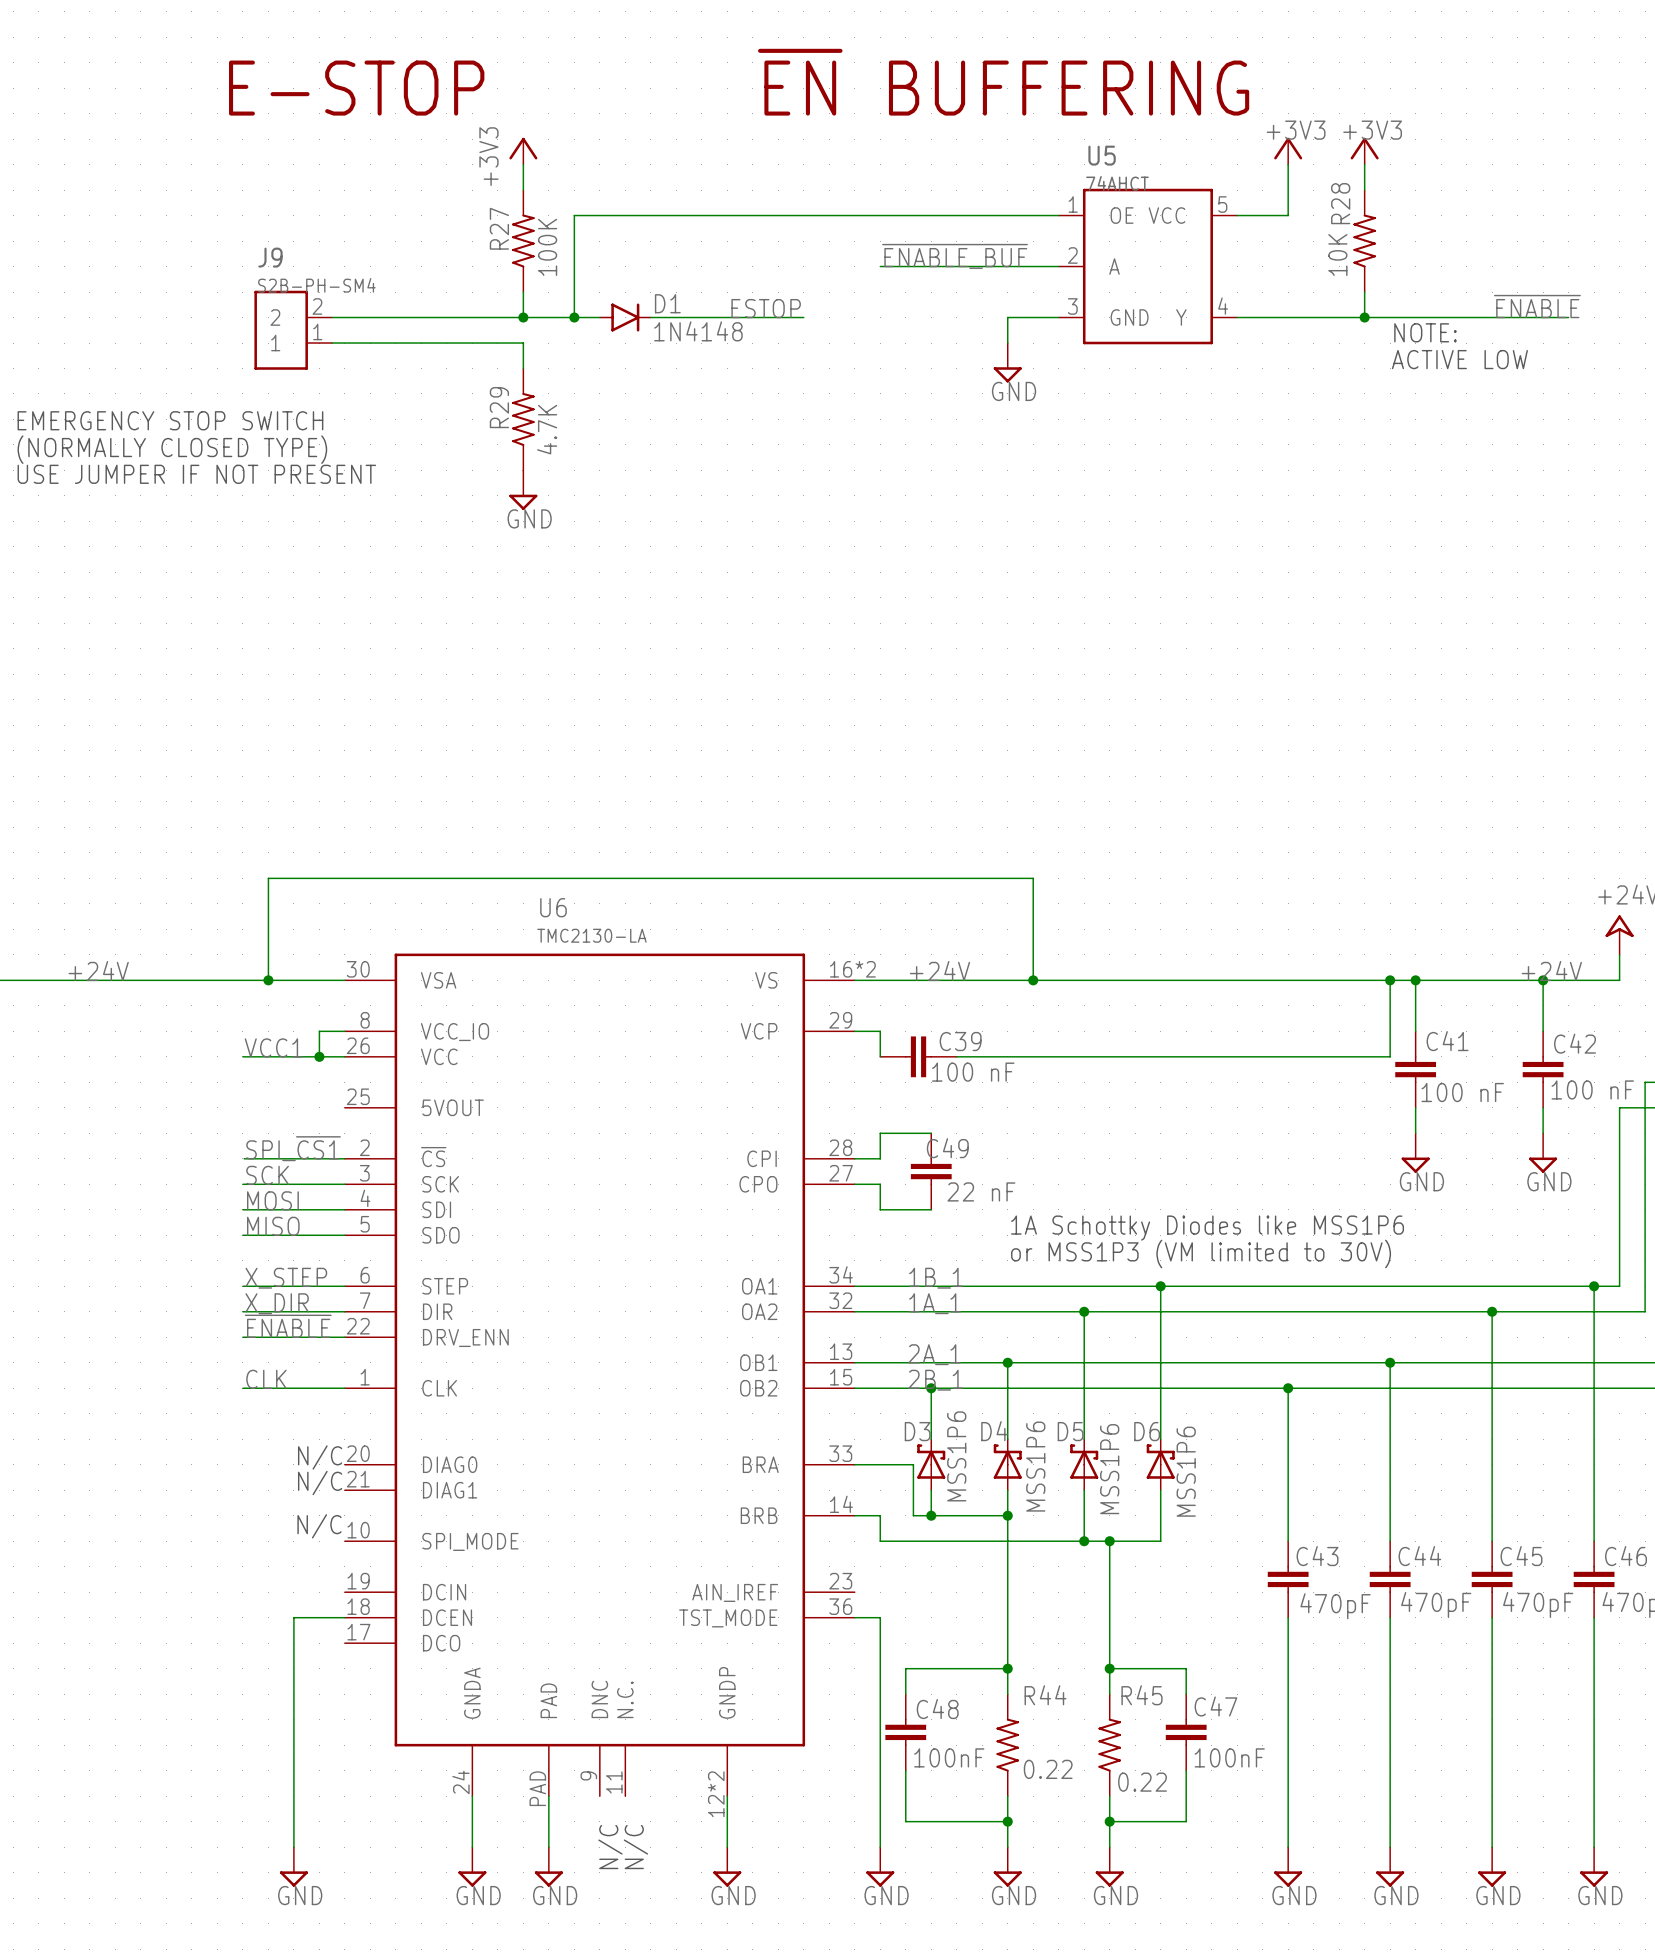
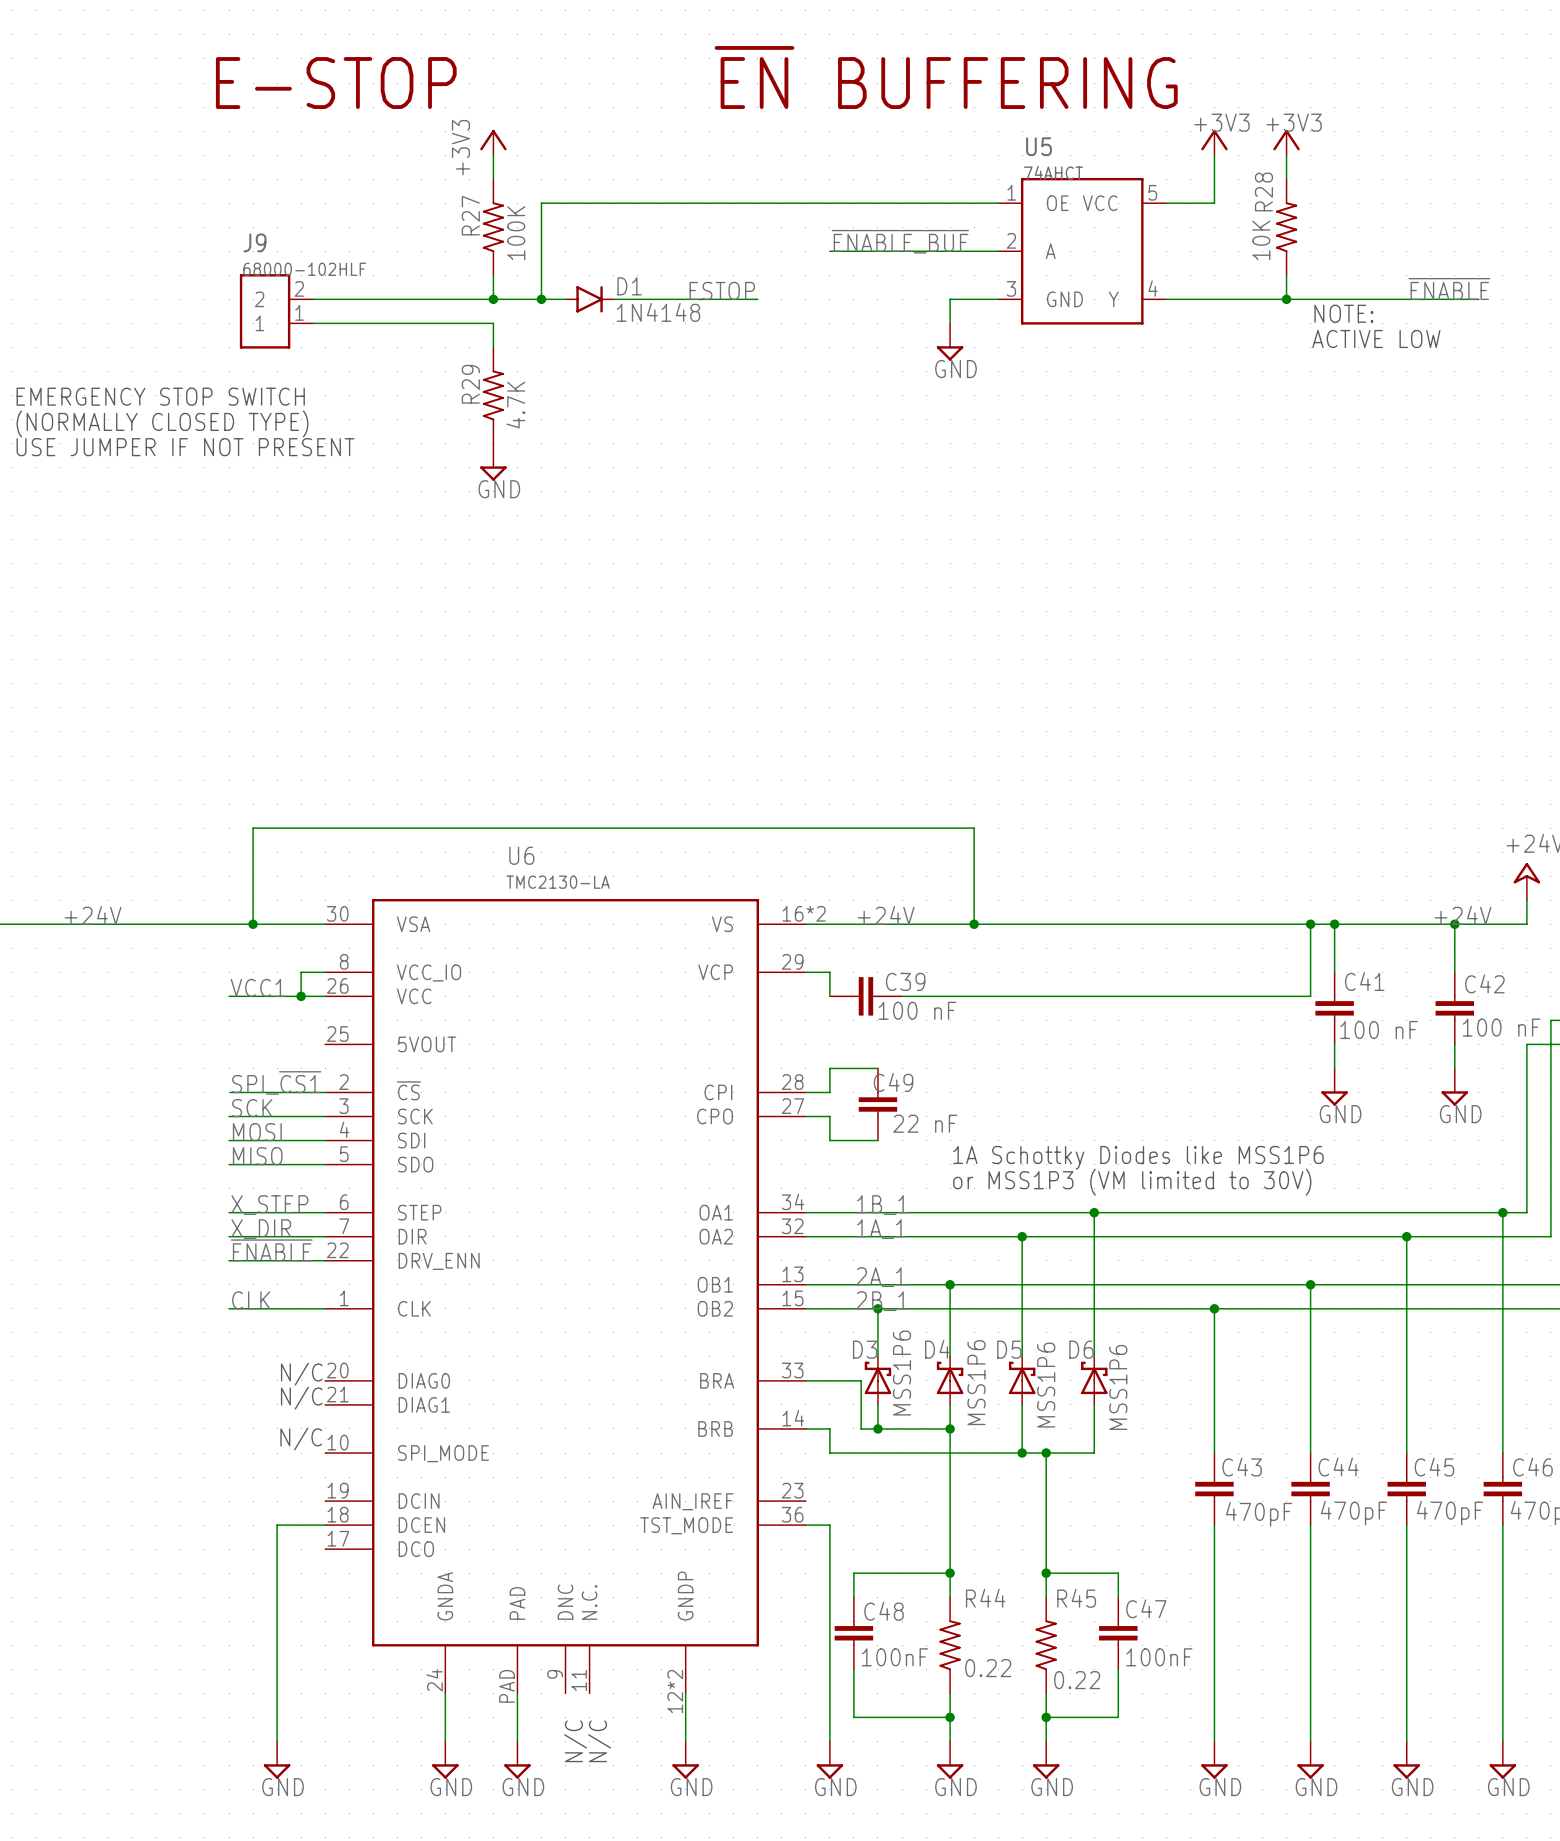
J9 value: S2B-PH-SM4 (316, 285) -> 68000-102HLF (304, 269)

